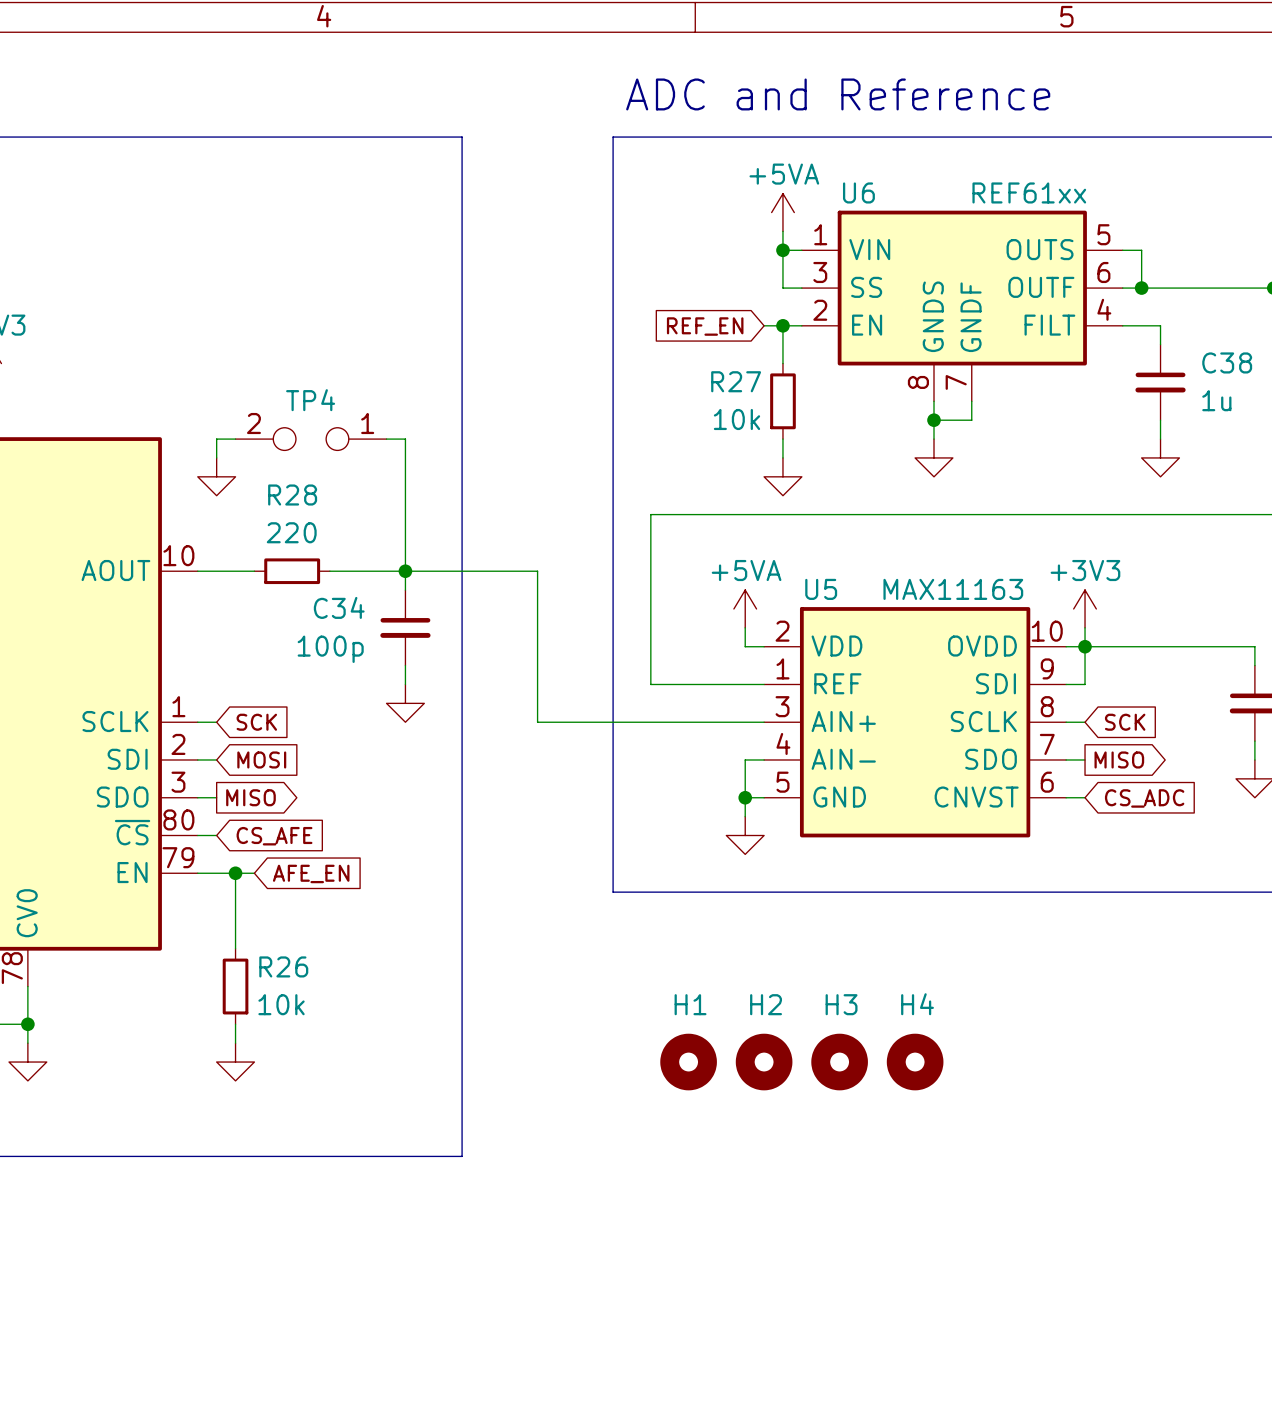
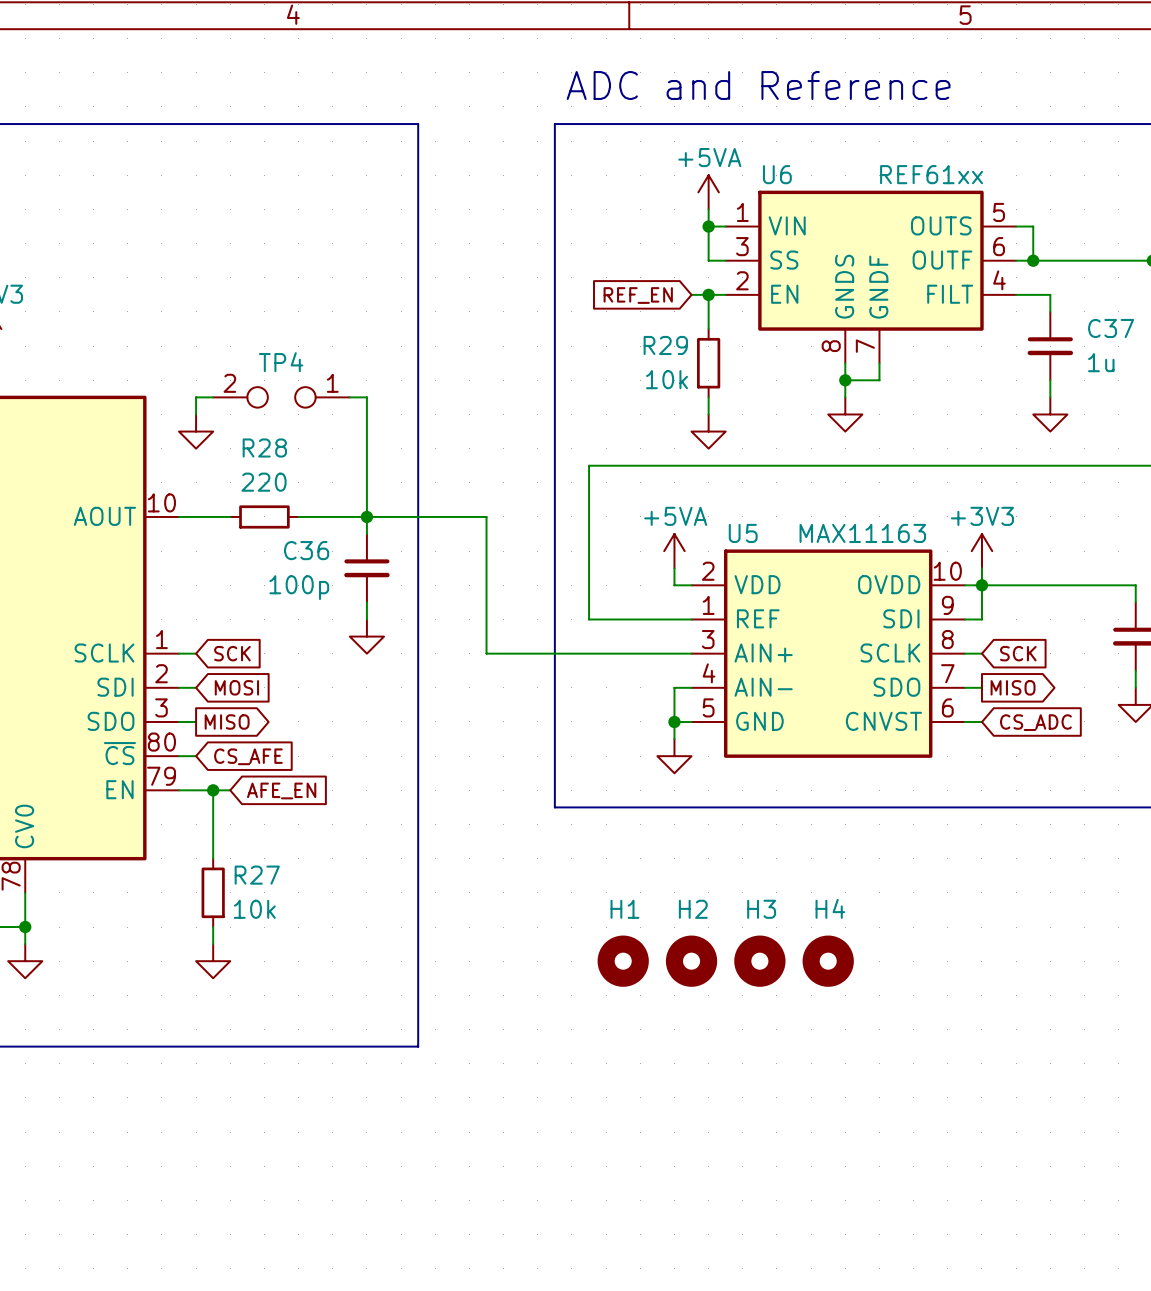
C38 name: C38 (1227, 362) -> C37 (1111, 328)
R27 name: R27 (736, 381) -> R29 (665, 345)
C34 name: C34 (339, 607) -> C36 (306, 550)
R26 name: R26 (283, 966) -> R27 (257, 875)

